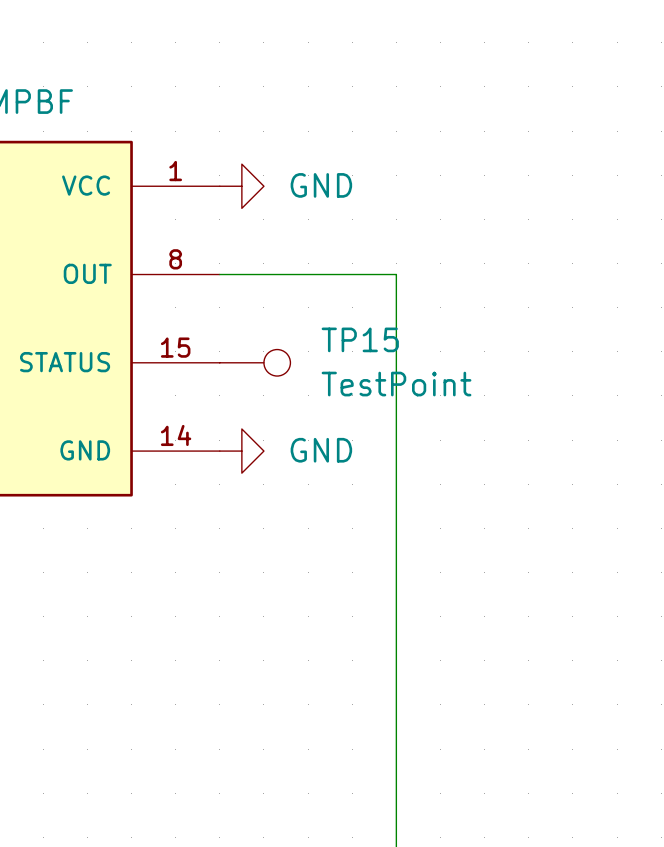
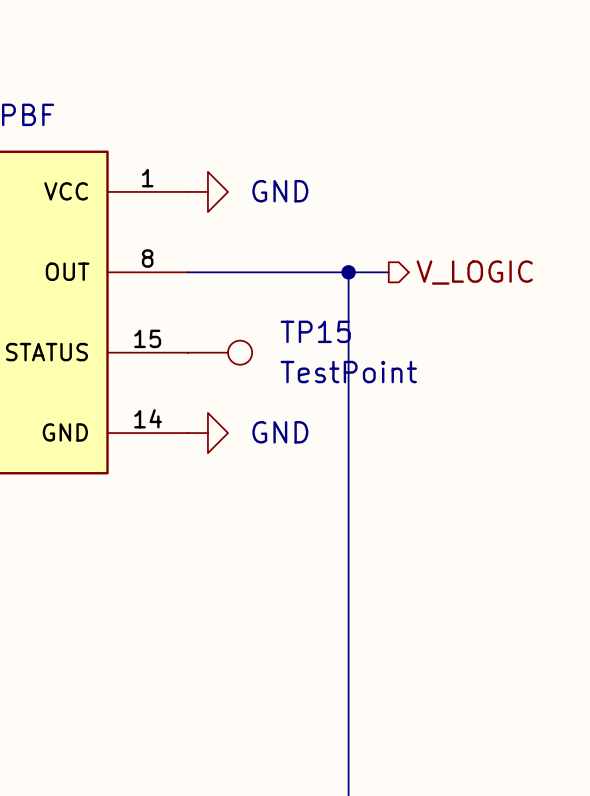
wire: none -> (348, 272) (388, 272)
junction: none -> (348, 272)
hierarchical label: none -> V_LOGIC (474, 272)

